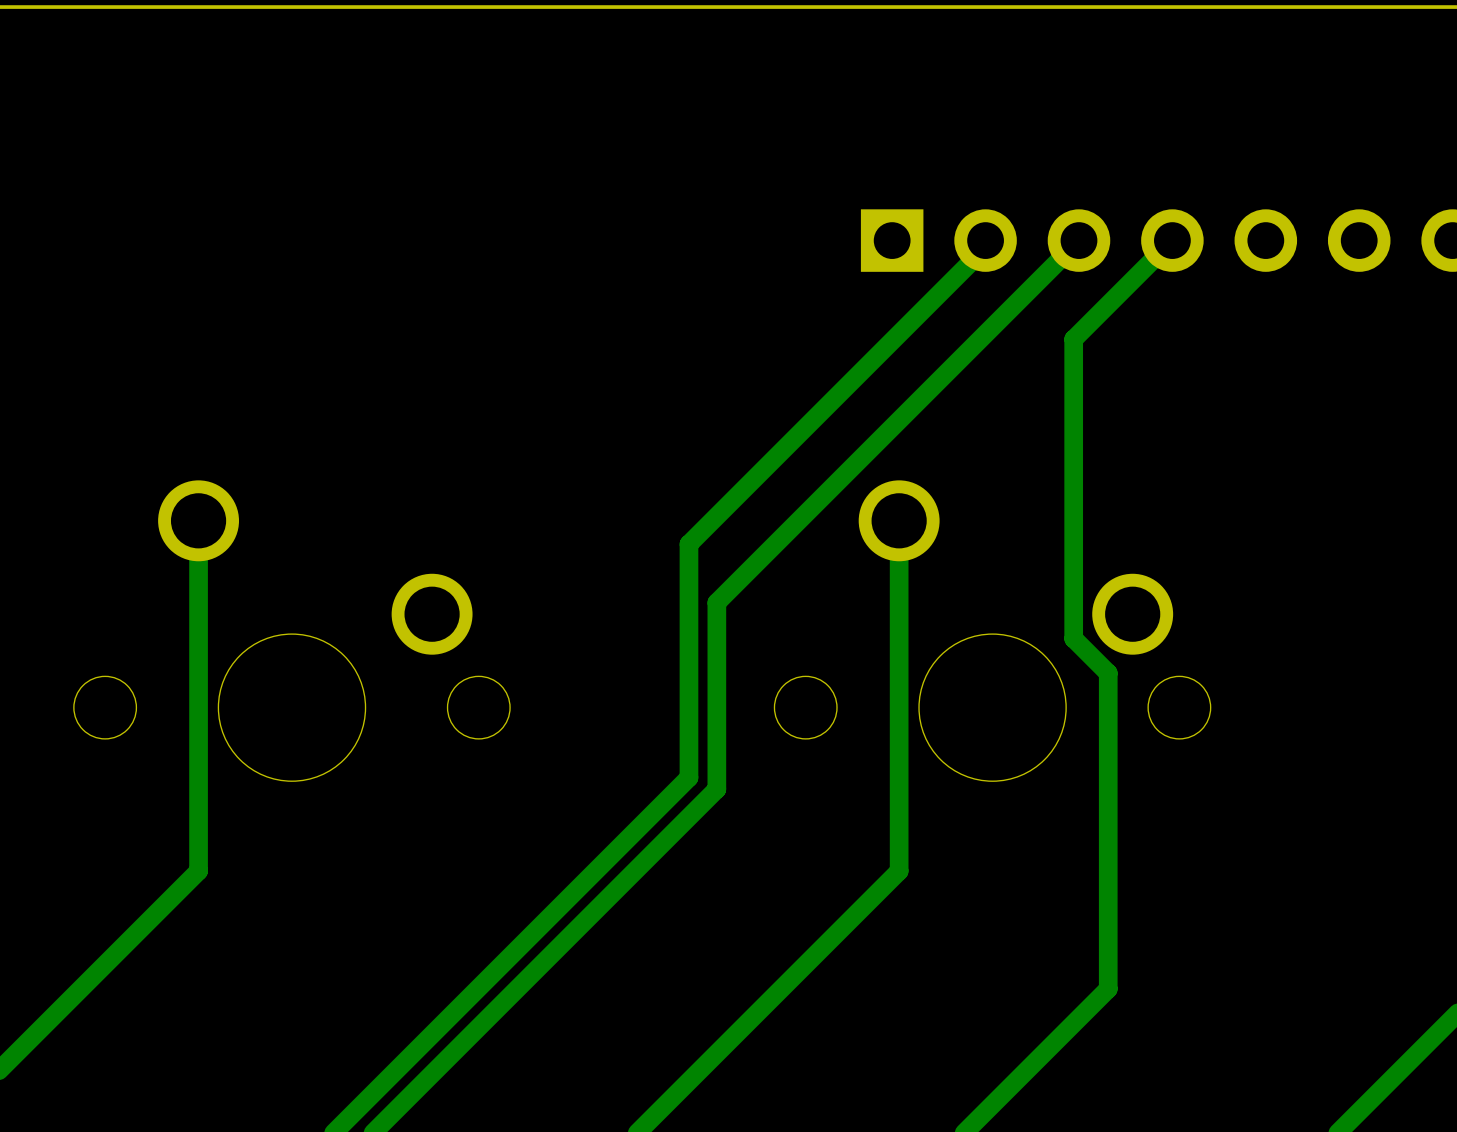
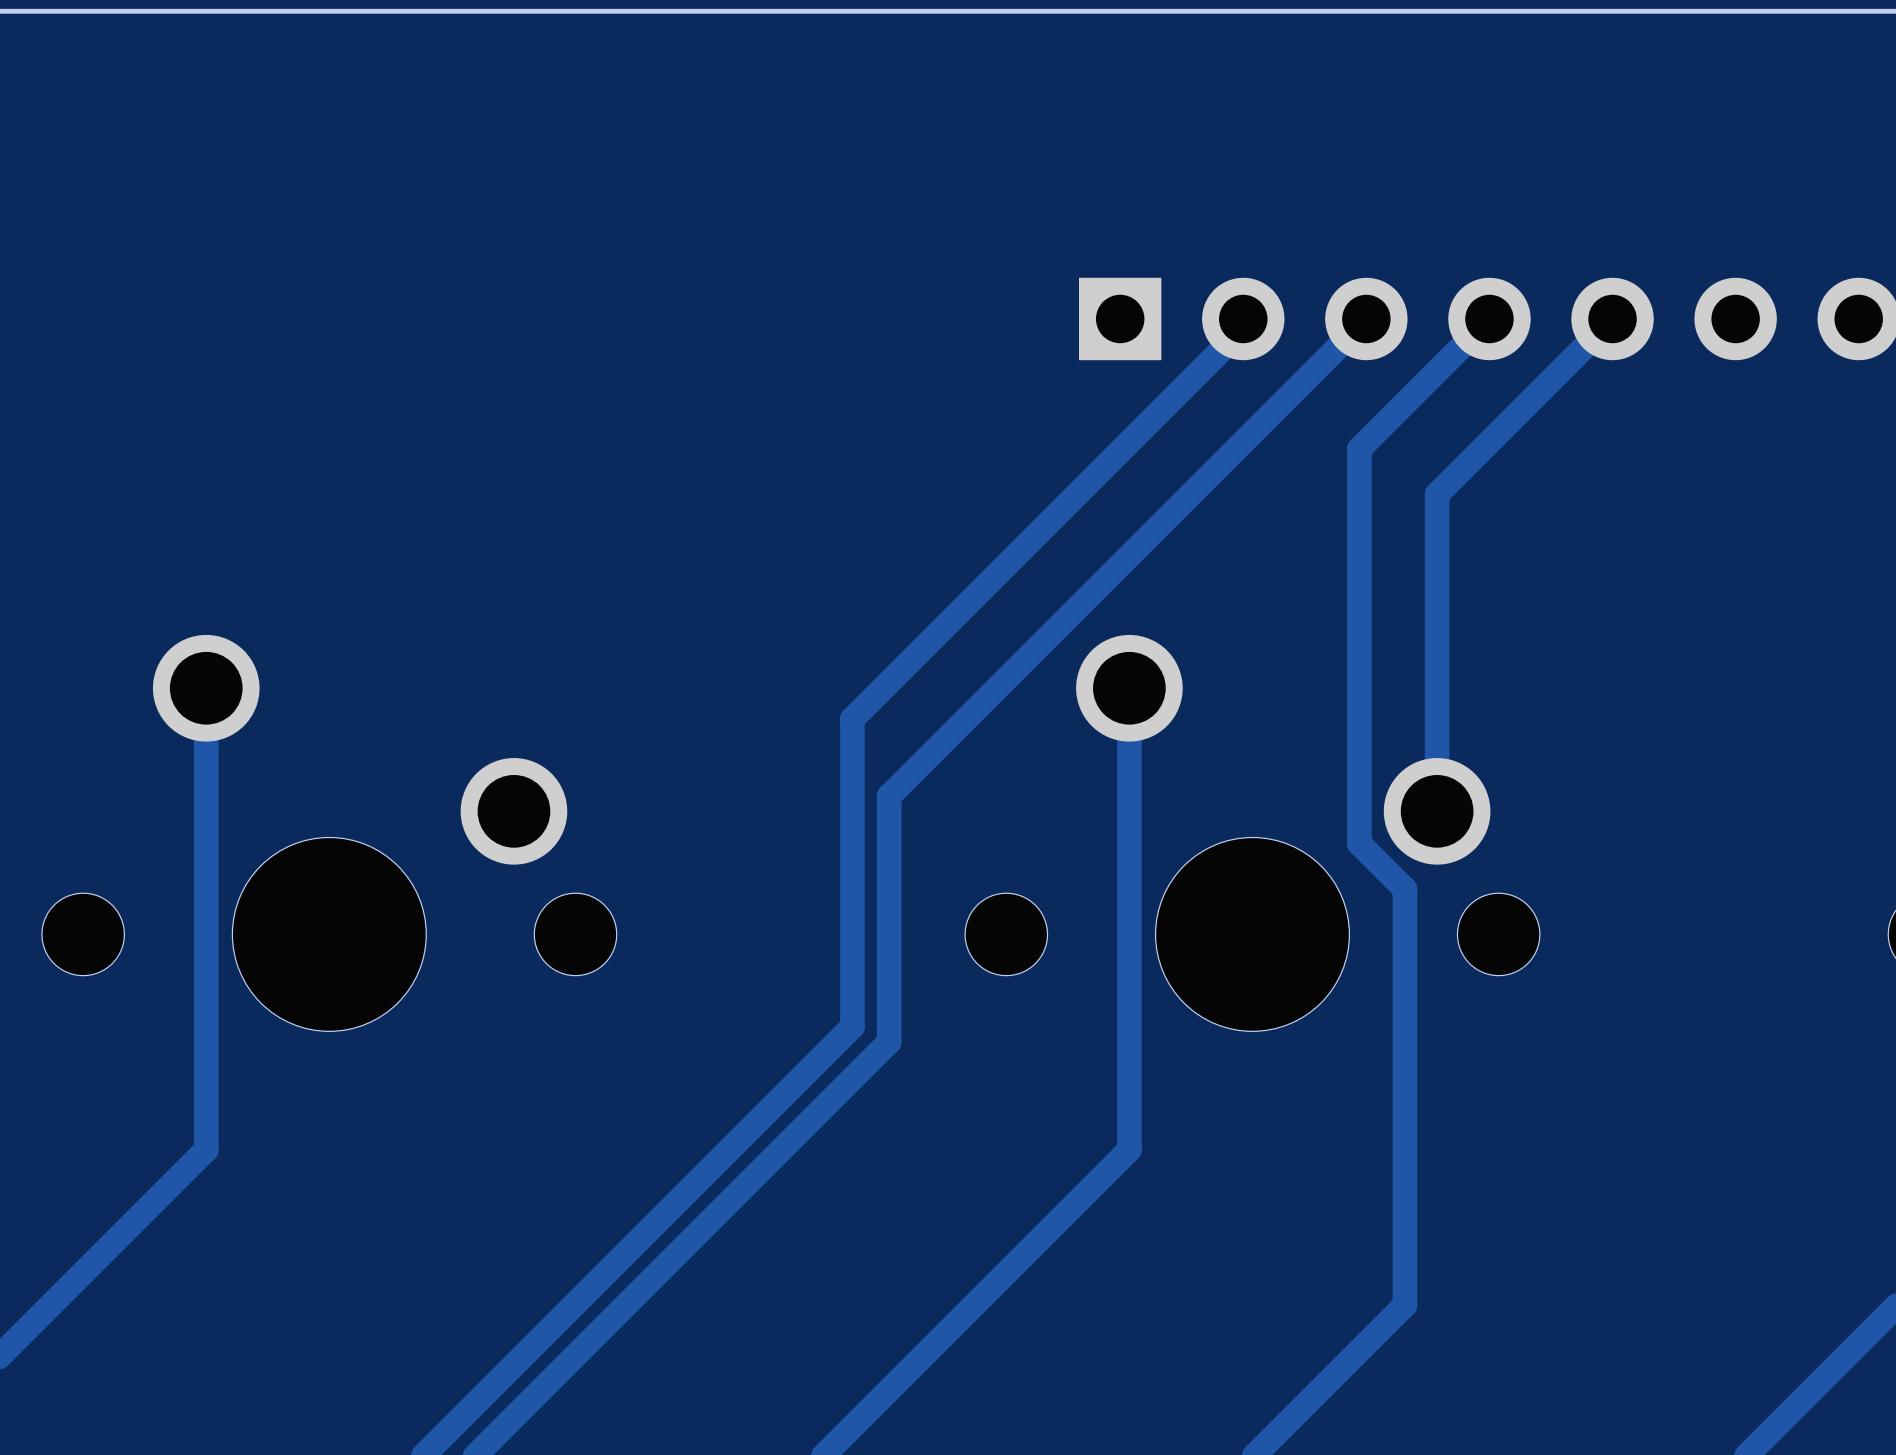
track: none -> (1612, 318) (1437, 494) (1437, 811)

